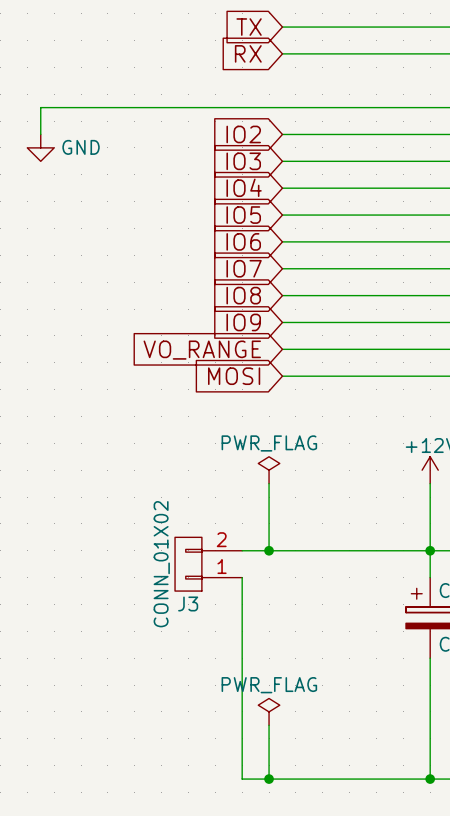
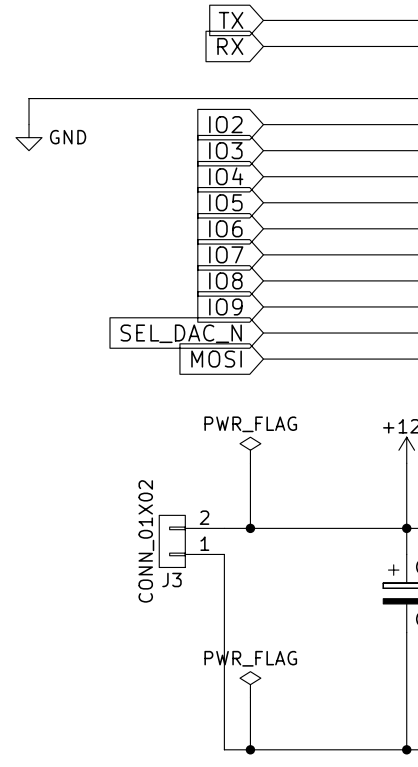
global label: VO_RANGE (202, 350) -> SEL_DAC_N (181, 333)

